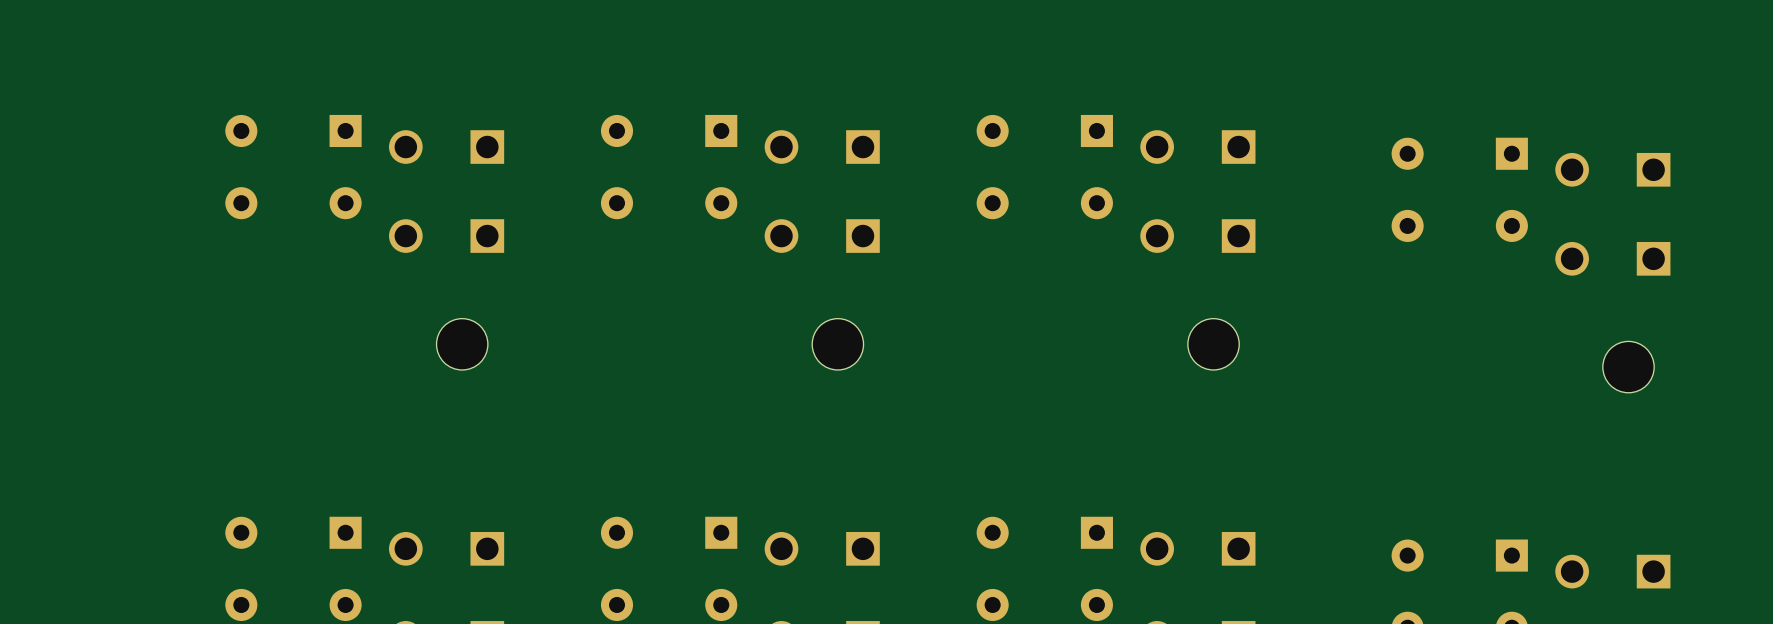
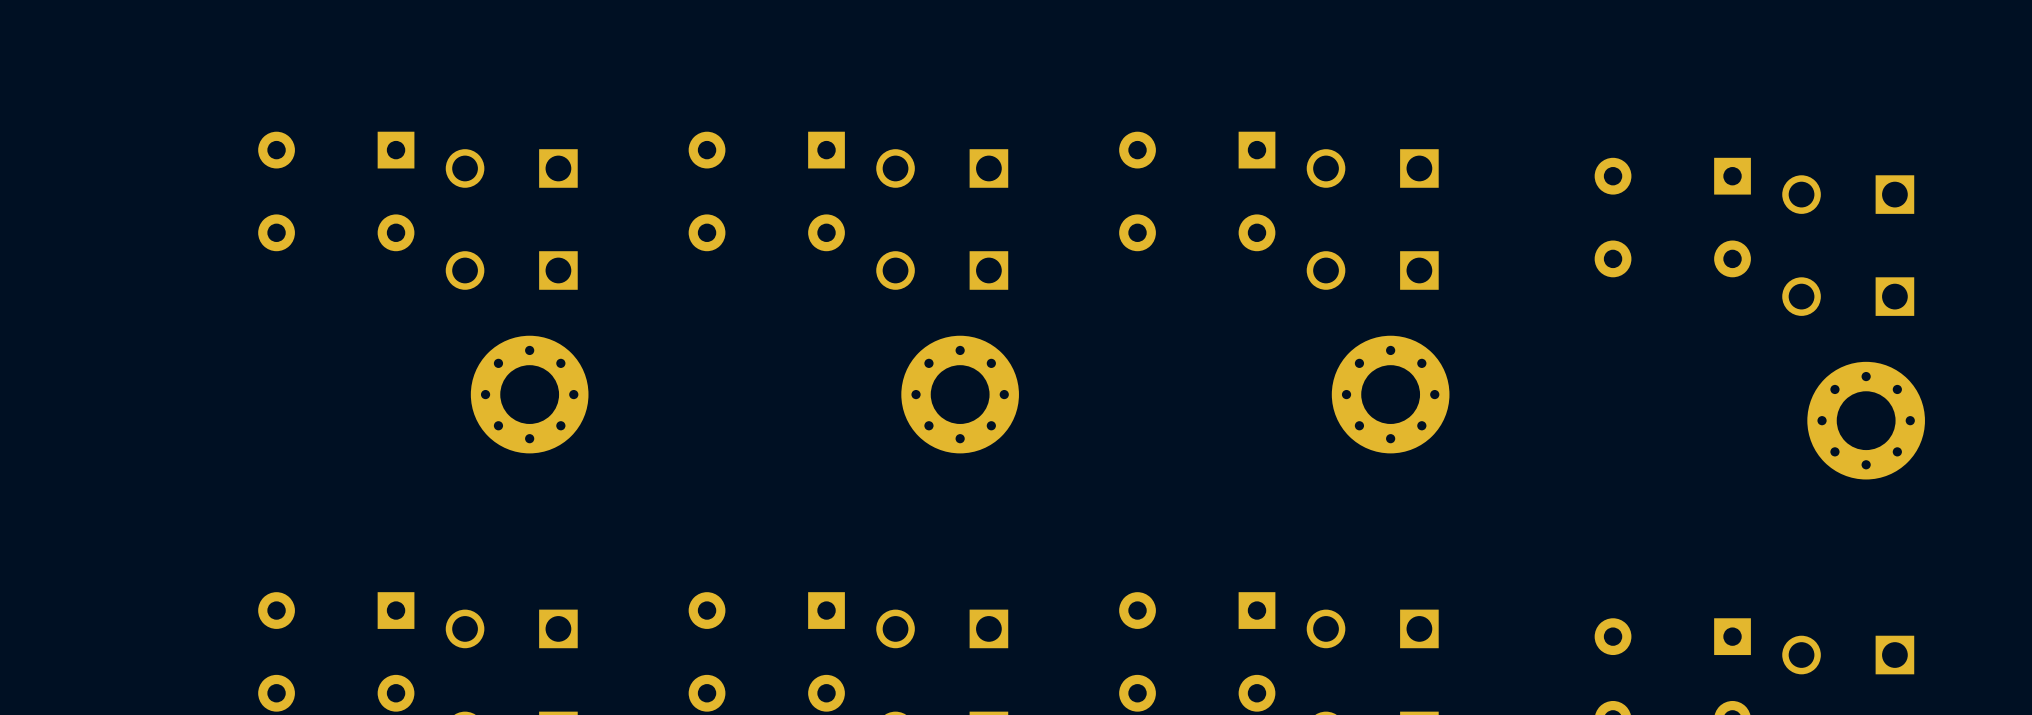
part footprint: [436, 318, 488, 370] -> [470, 335, 589, 454]
part footprint: [812, 318, 864, 370] -> [901, 335, 1019, 454]
part footprint: [1187, 318, 1240, 370] -> [1331, 335, 1450, 454]
part footprint: [1602, 341, 1655, 393] -> [1807, 361, 1925, 480]

